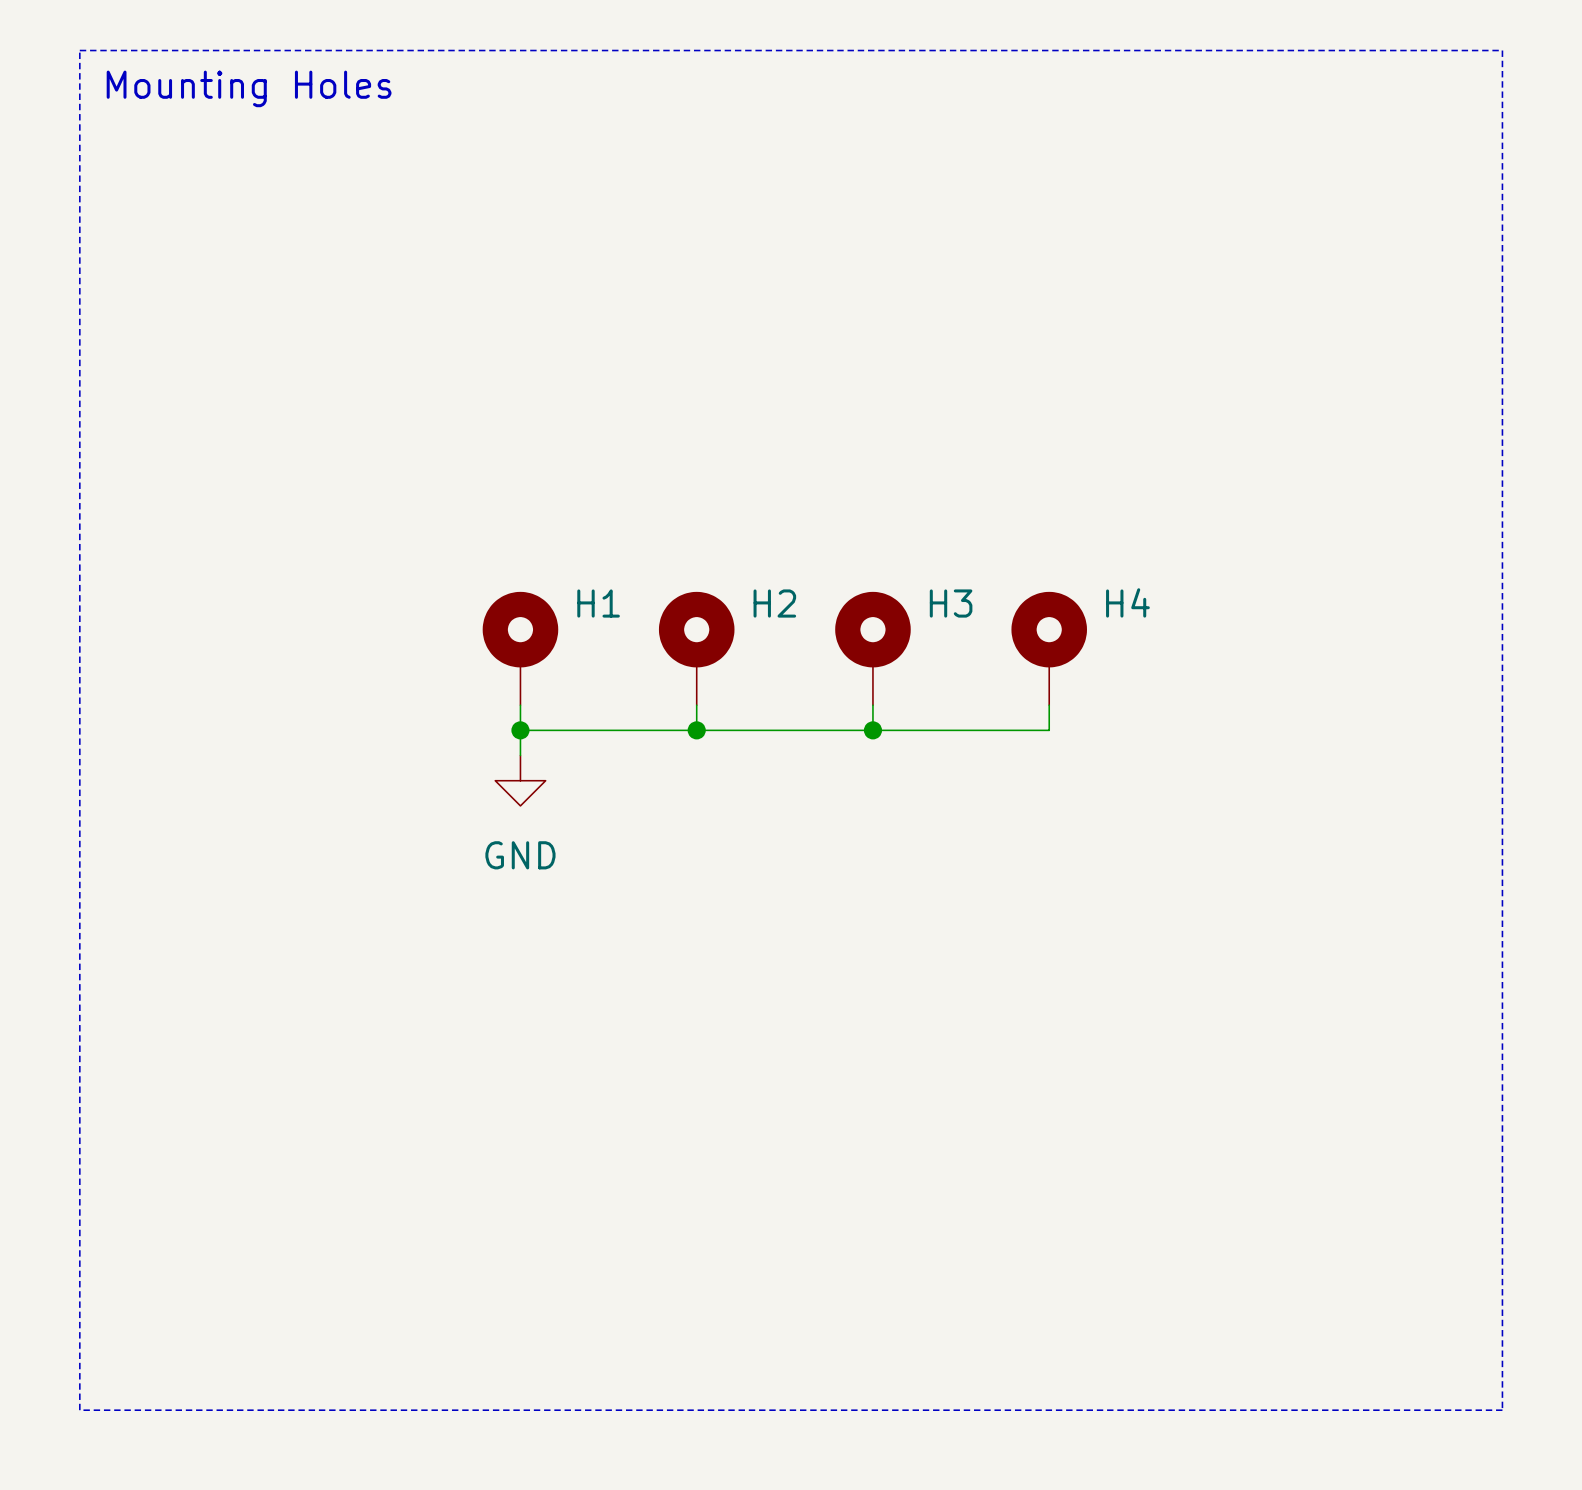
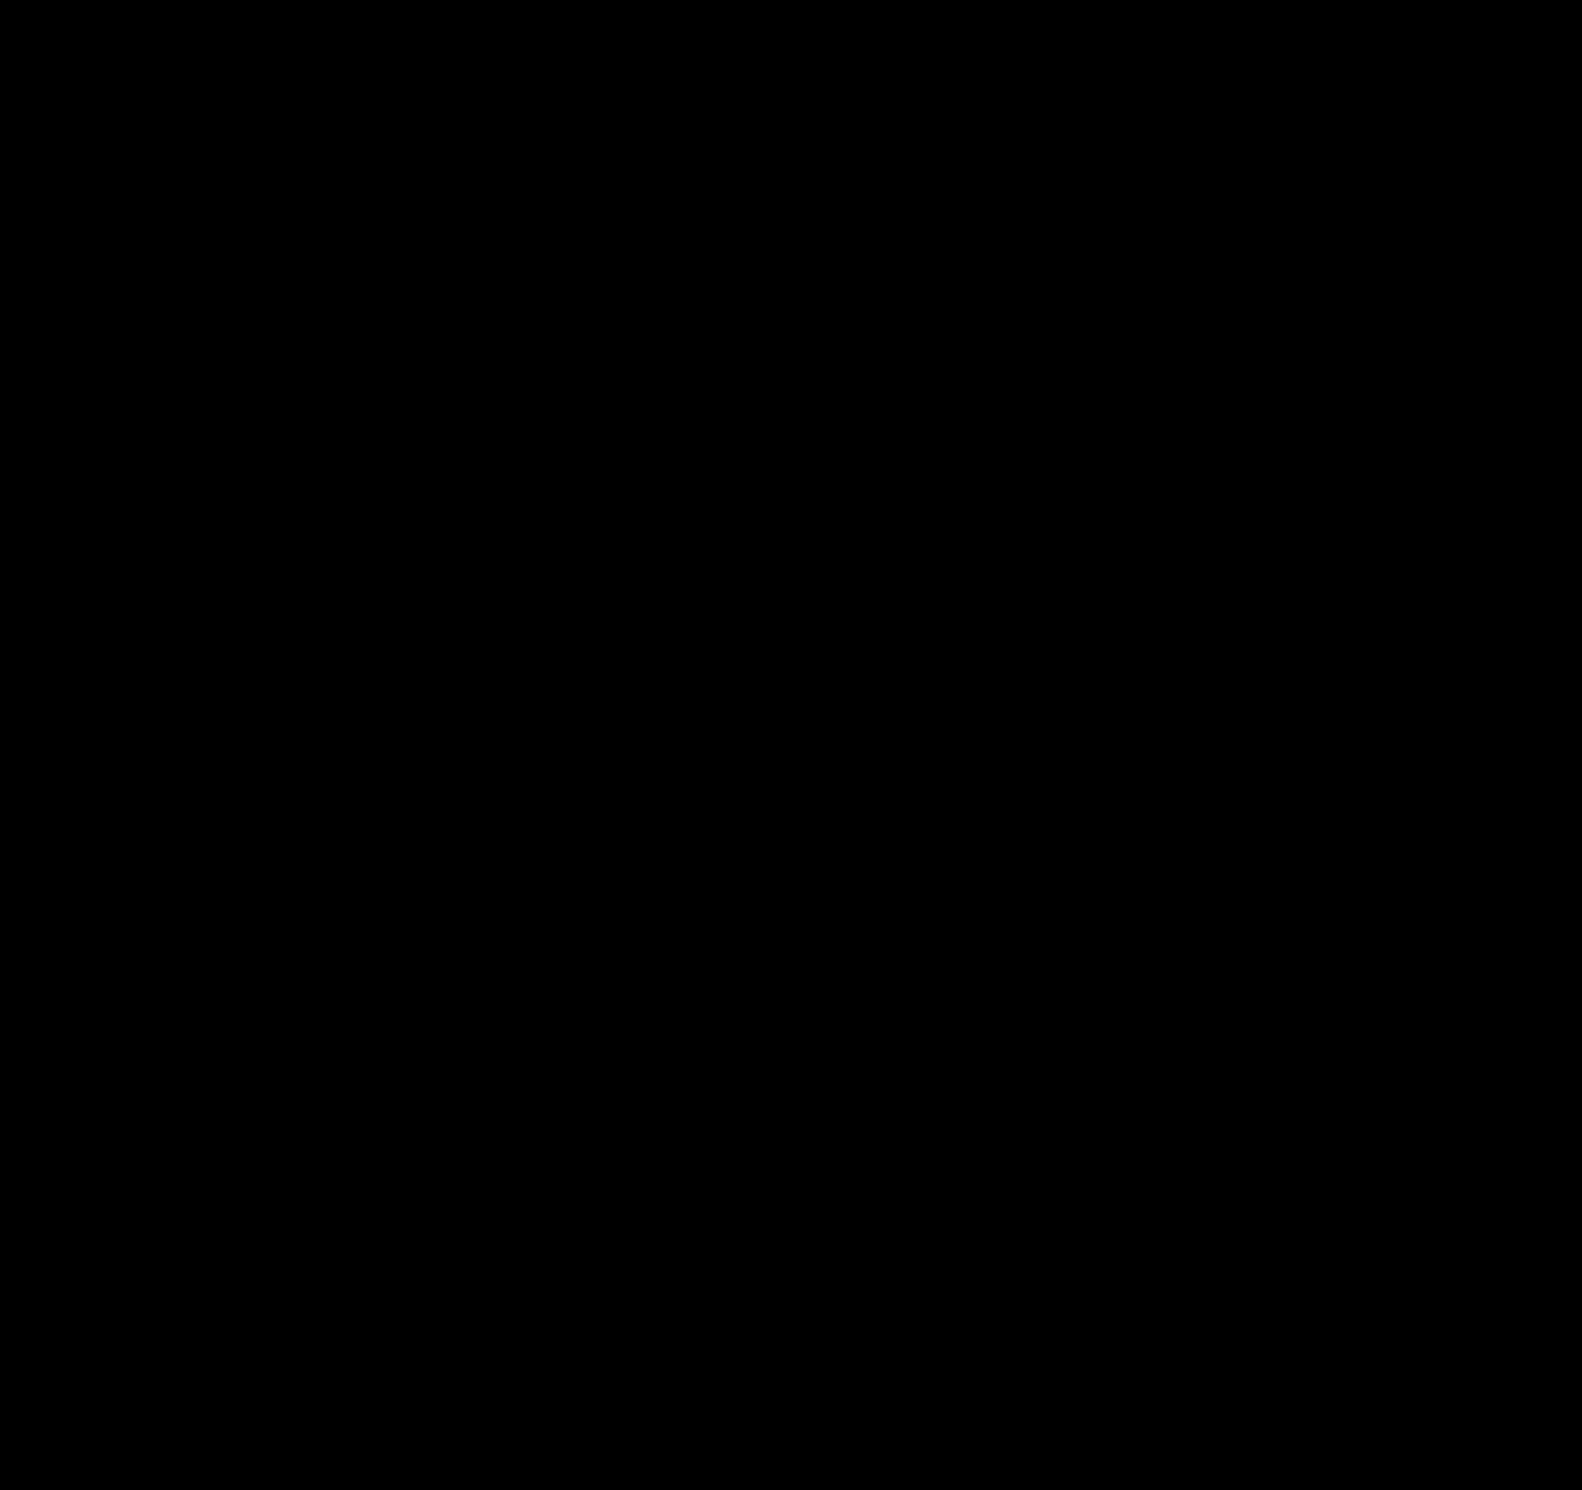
line: (79, 50) (1502, 50) (1502, 1410) (79, 1410) (79, 50) -> none
text: Mounting Holes (249, 88) -> none
H1: (520, 648) -> none
H2: (696, 648) -> none
H3: (872, 648) -> none
H4: (1049, 648) -> none
wire: (520, 705) (520, 755) -> none
wire: (696, 705) (696, 730) -> none
wire: (872, 705) (872, 730) -> none
wire: (1049, 705) (1049, 730) (520, 730) -> none
junction: (520, 730) -> none
junction: (696, 730) -> none
junction: (872, 730) -> none
power symbol: GND (520, 780) -> none

